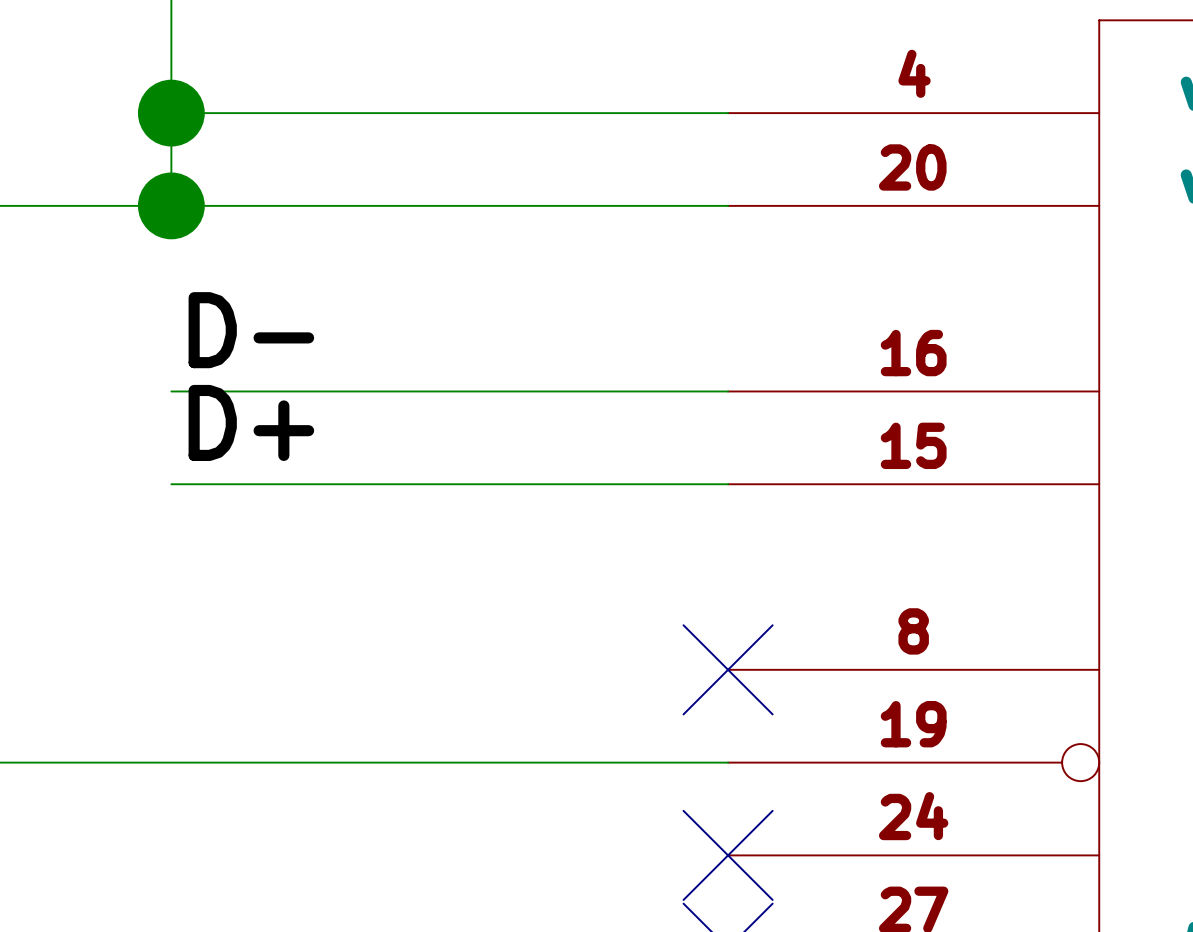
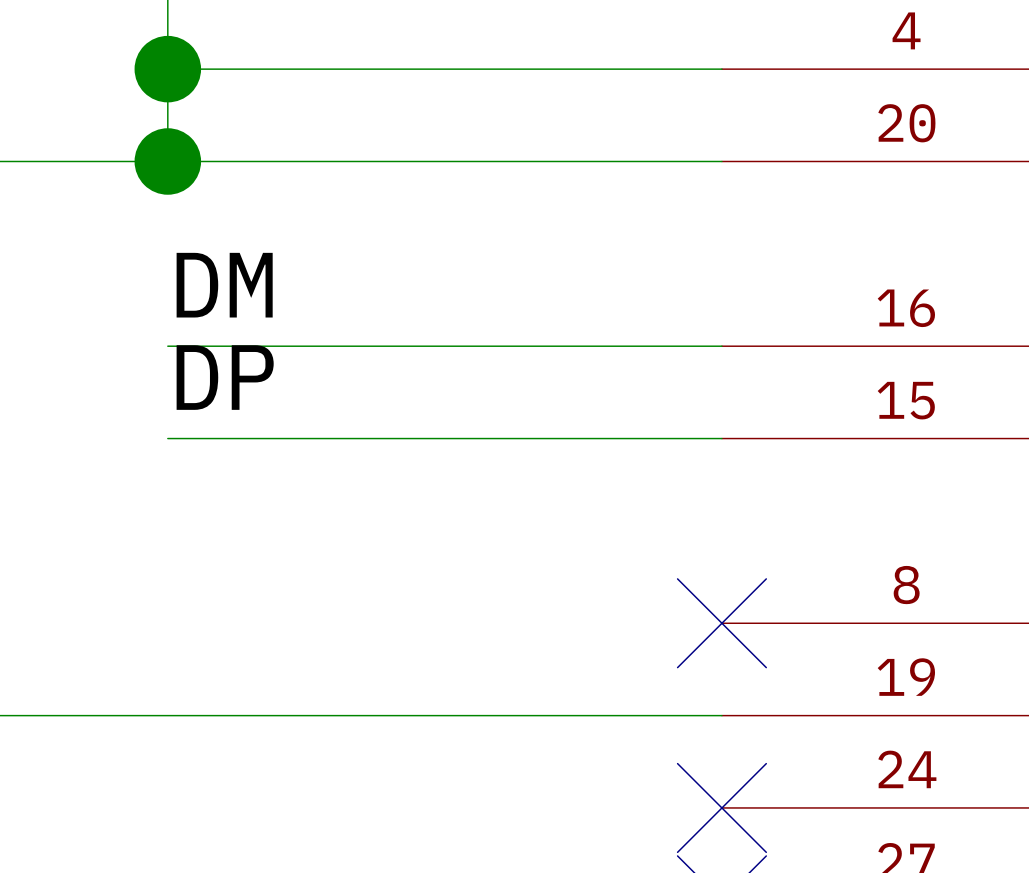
label: D- (251, 330) -> DM (224, 285)
label: D+ (251, 422) -> DP (225, 377)

